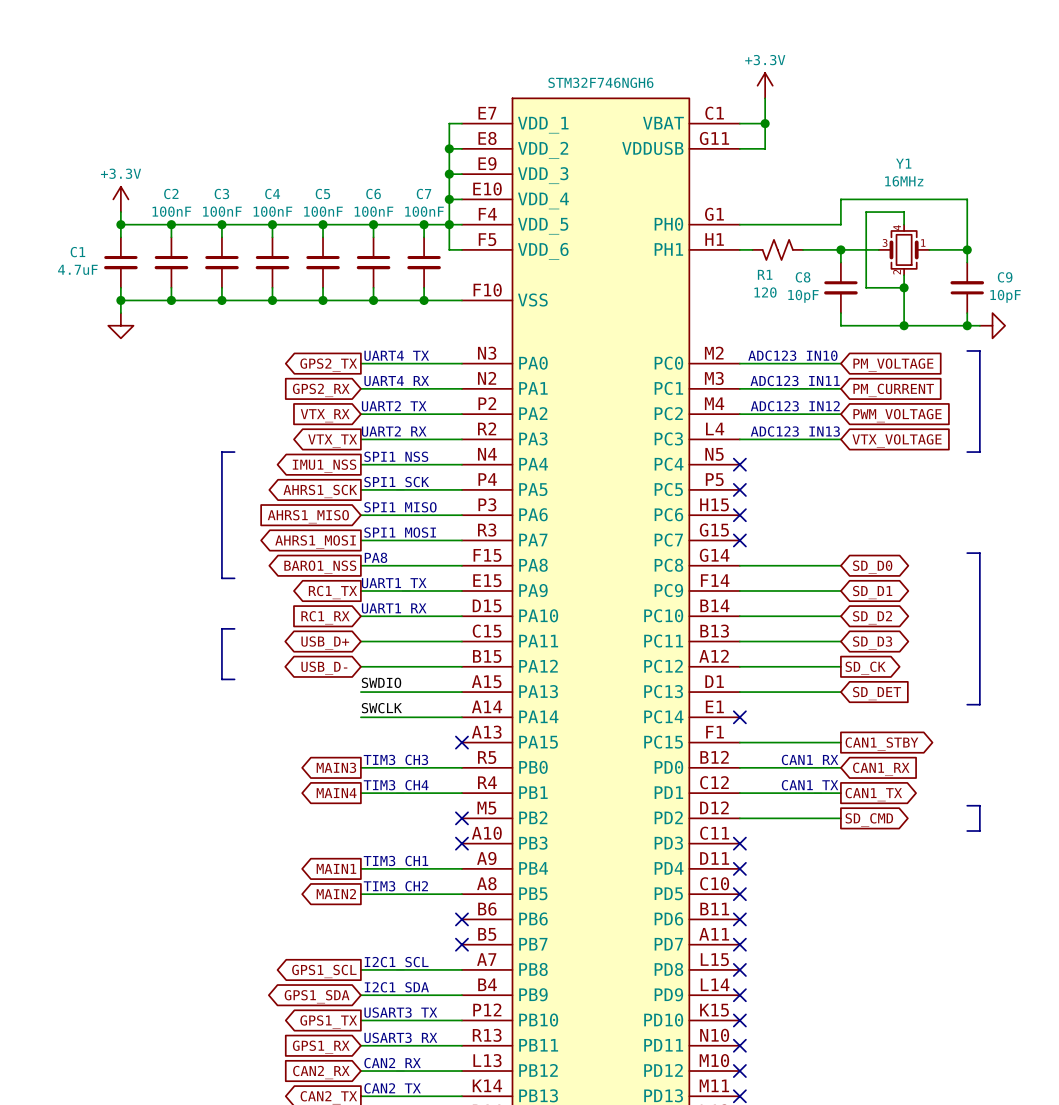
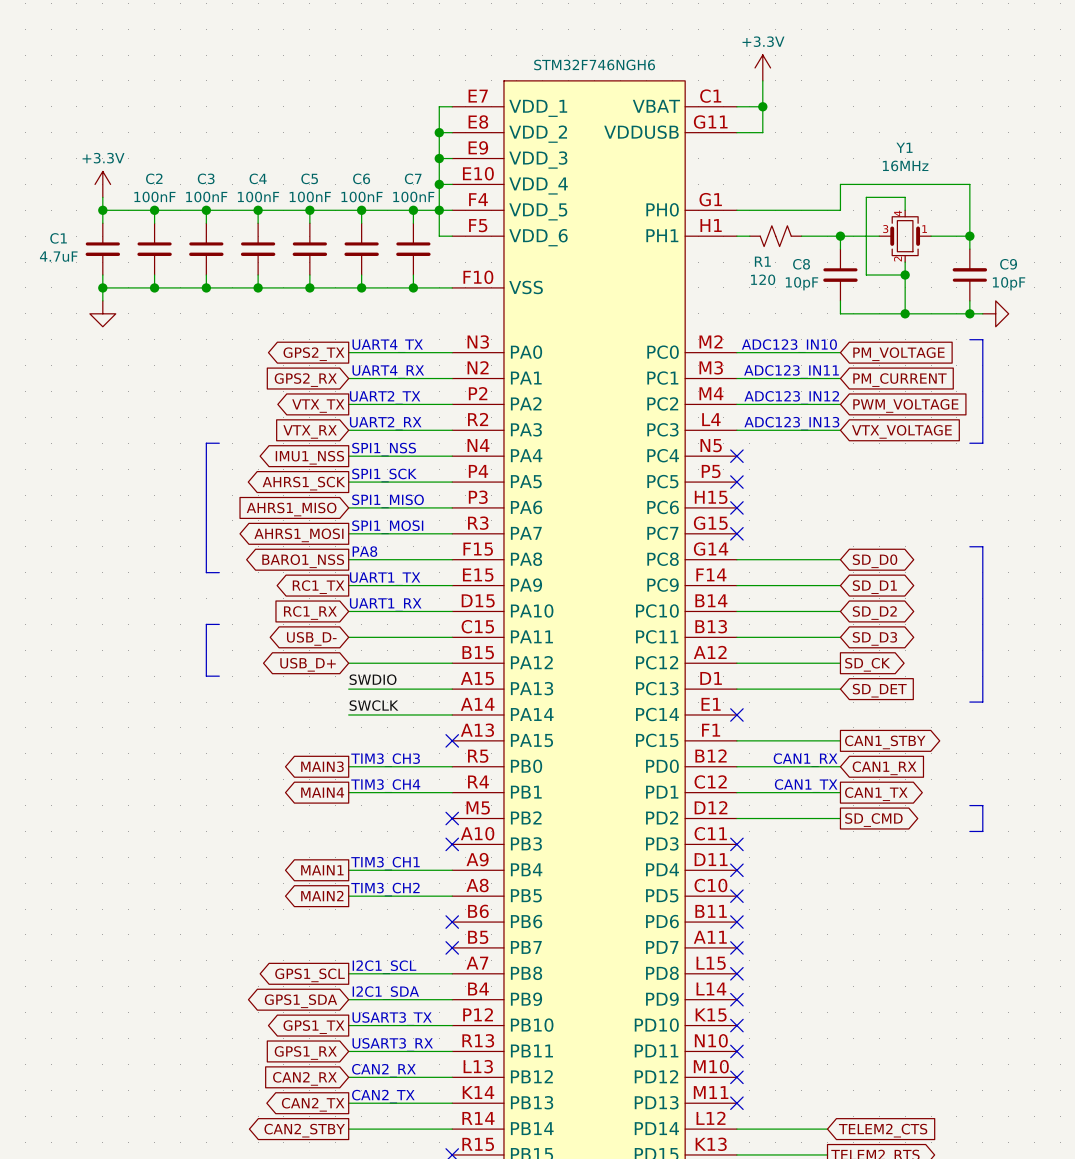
global label shape: input (325, 415) -> output (318, 406)
global label: VTX_RX (325, 415) -> VTX_TX (318, 406)
global label shape: output (332, 441) -> input (310, 431)
global label: VTX_TX (332, 441) -> VTX_RX (310, 431)
global label: USB_D+ (325, 643) -> USB_D- (311, 638)
global label: USB_D- (324, 668) -> USB_D+ (308, 664)

